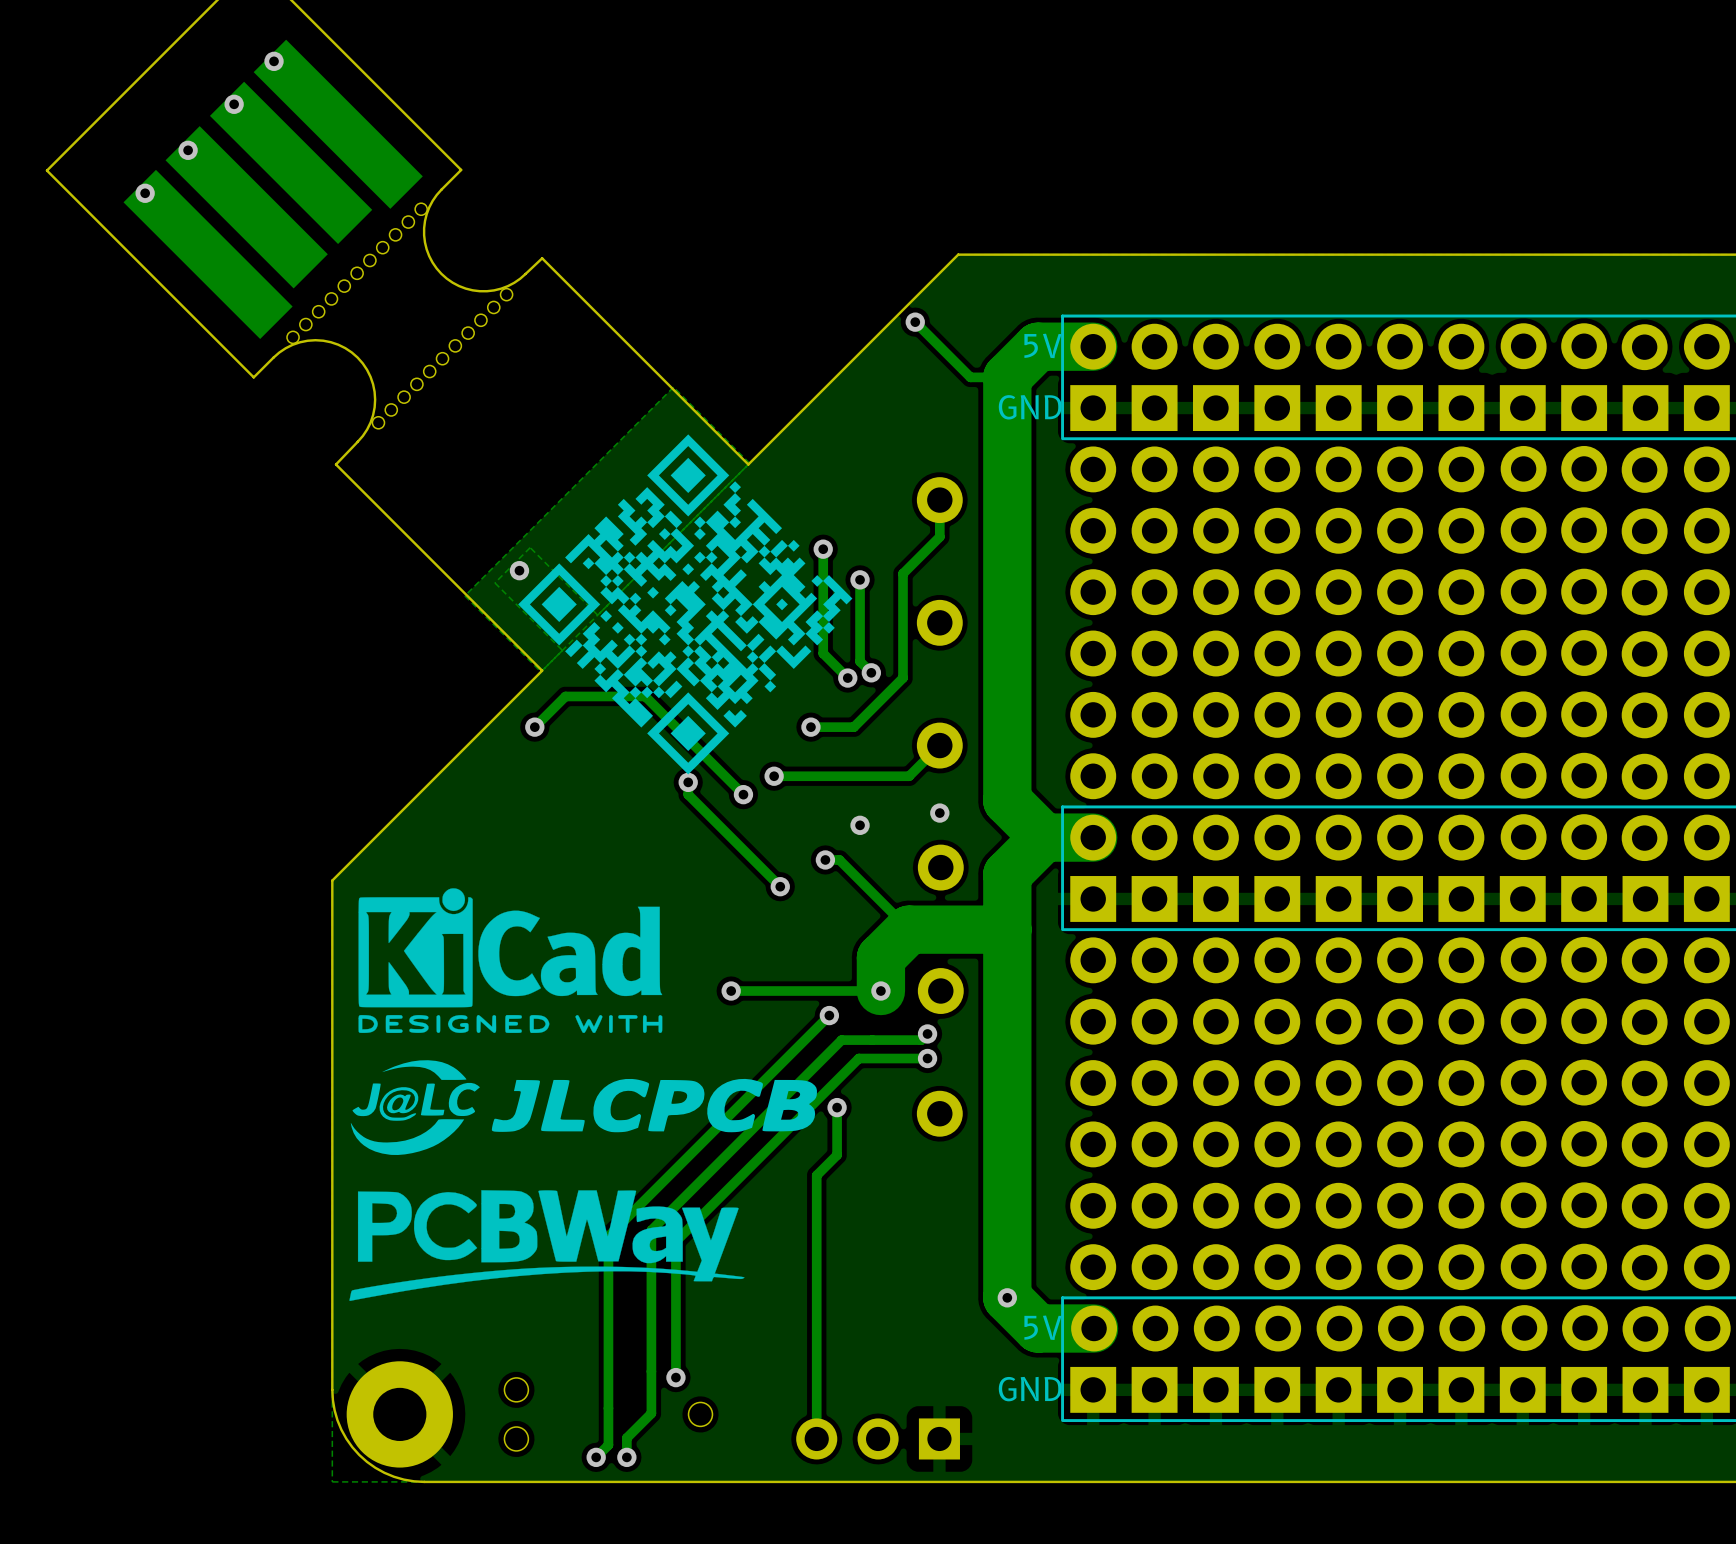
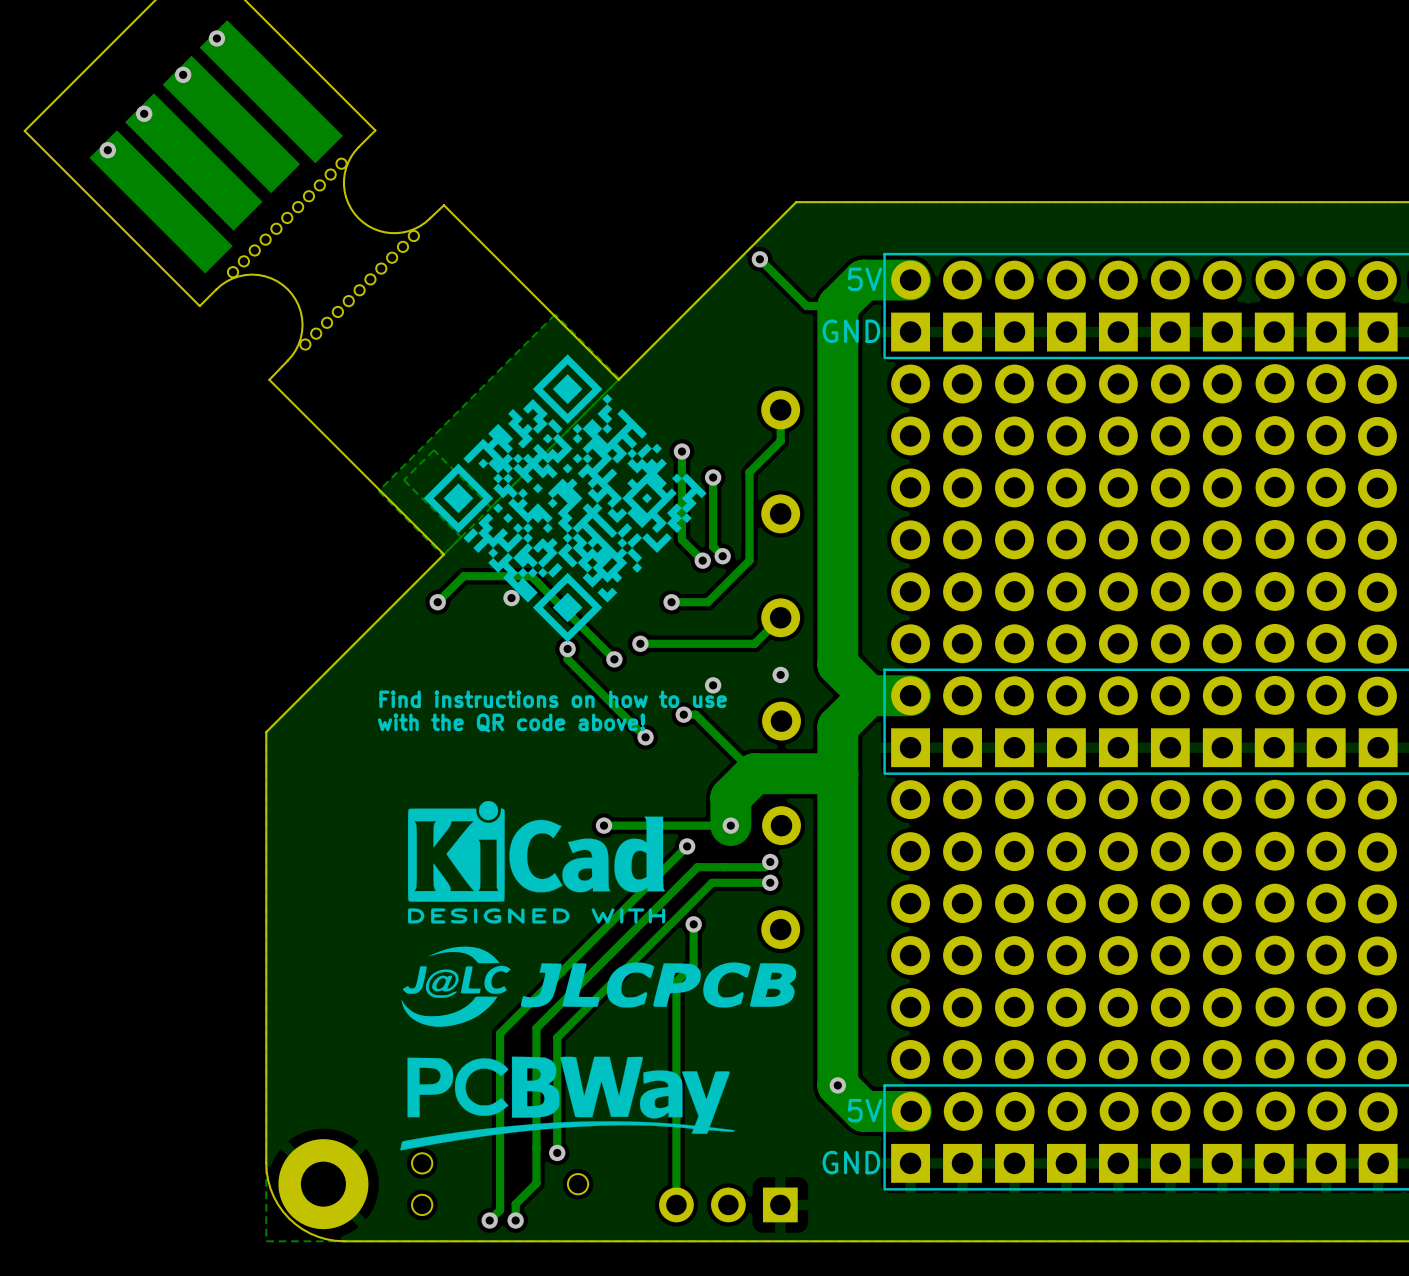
via: (519, 570) -> none
via: none -> (511, 598)
text: none -> Find instructions on how to use (553, 699)
text: none -> with the QR code above! (511, 723)
drawing position: (510, 960) -> (536, 862)
drawing position: (583, 1107) -> (598, 986)
drawing position: (546, 1245) -> (567, 1103)

